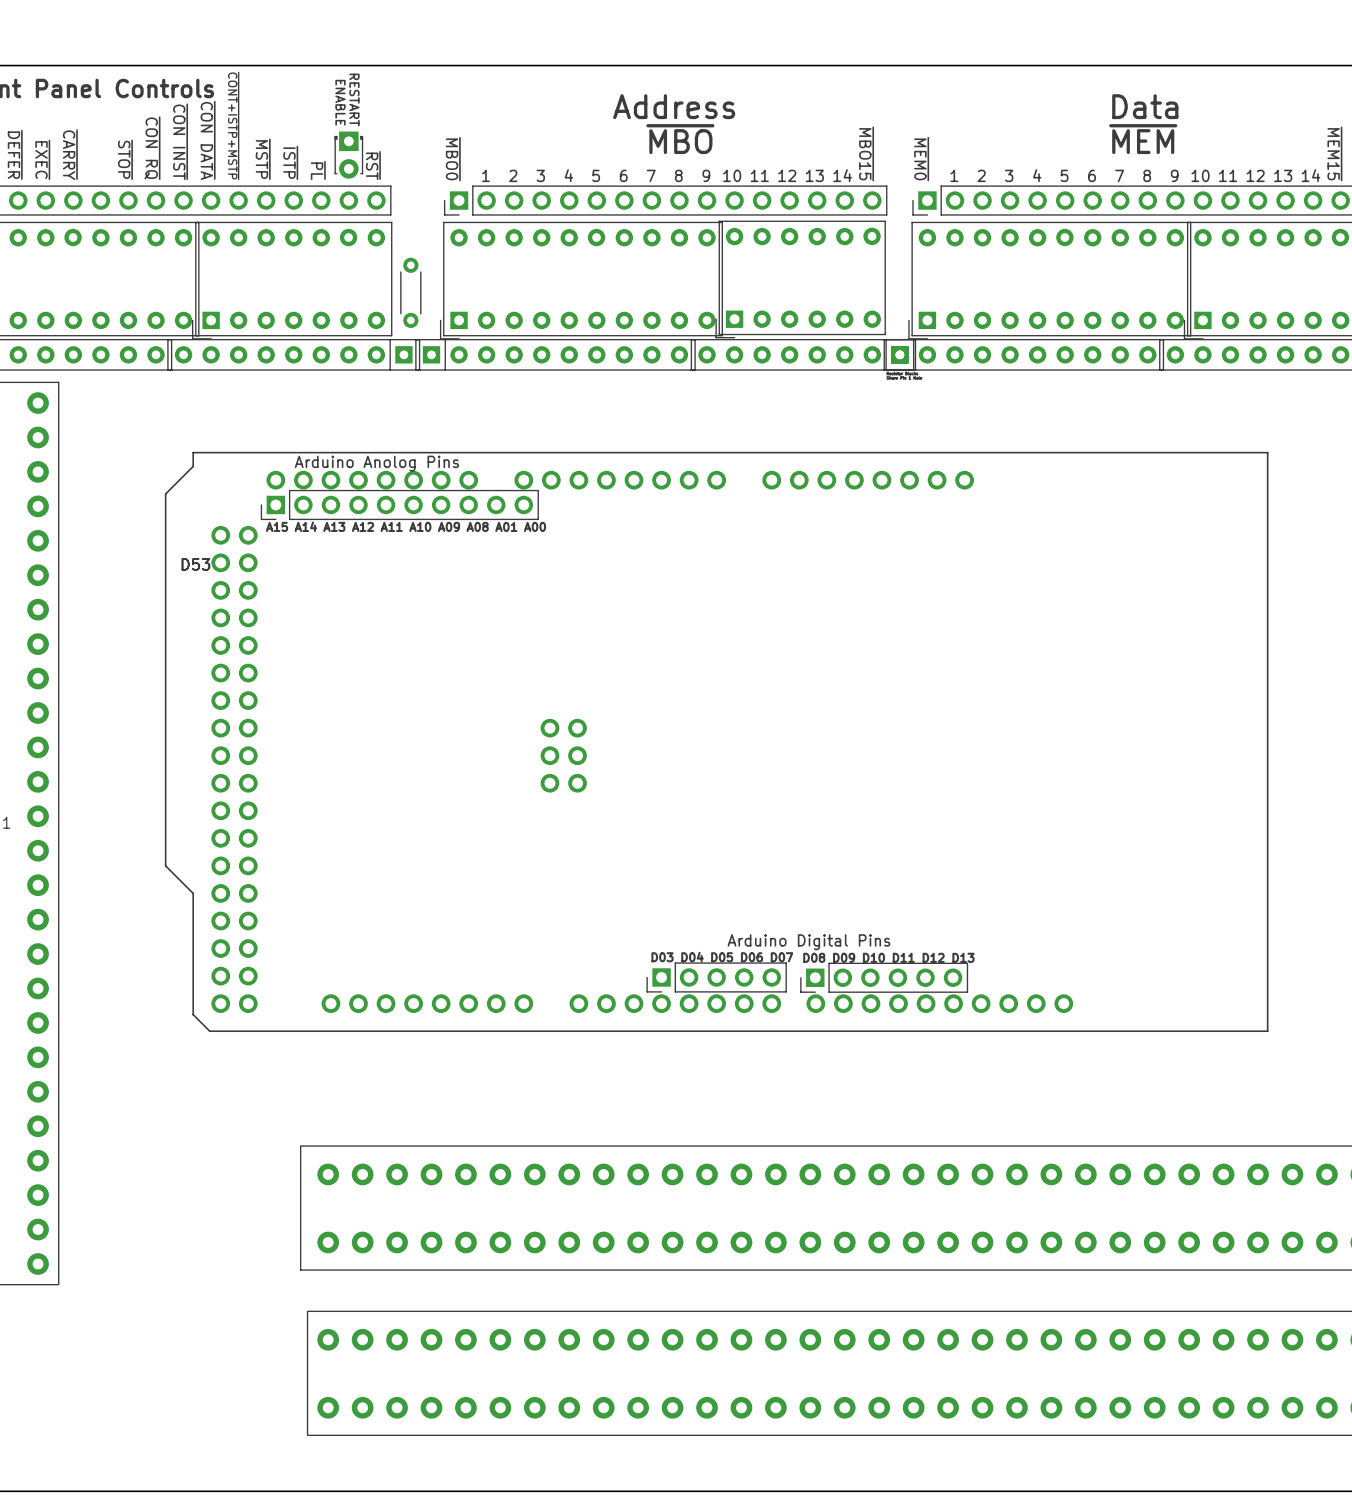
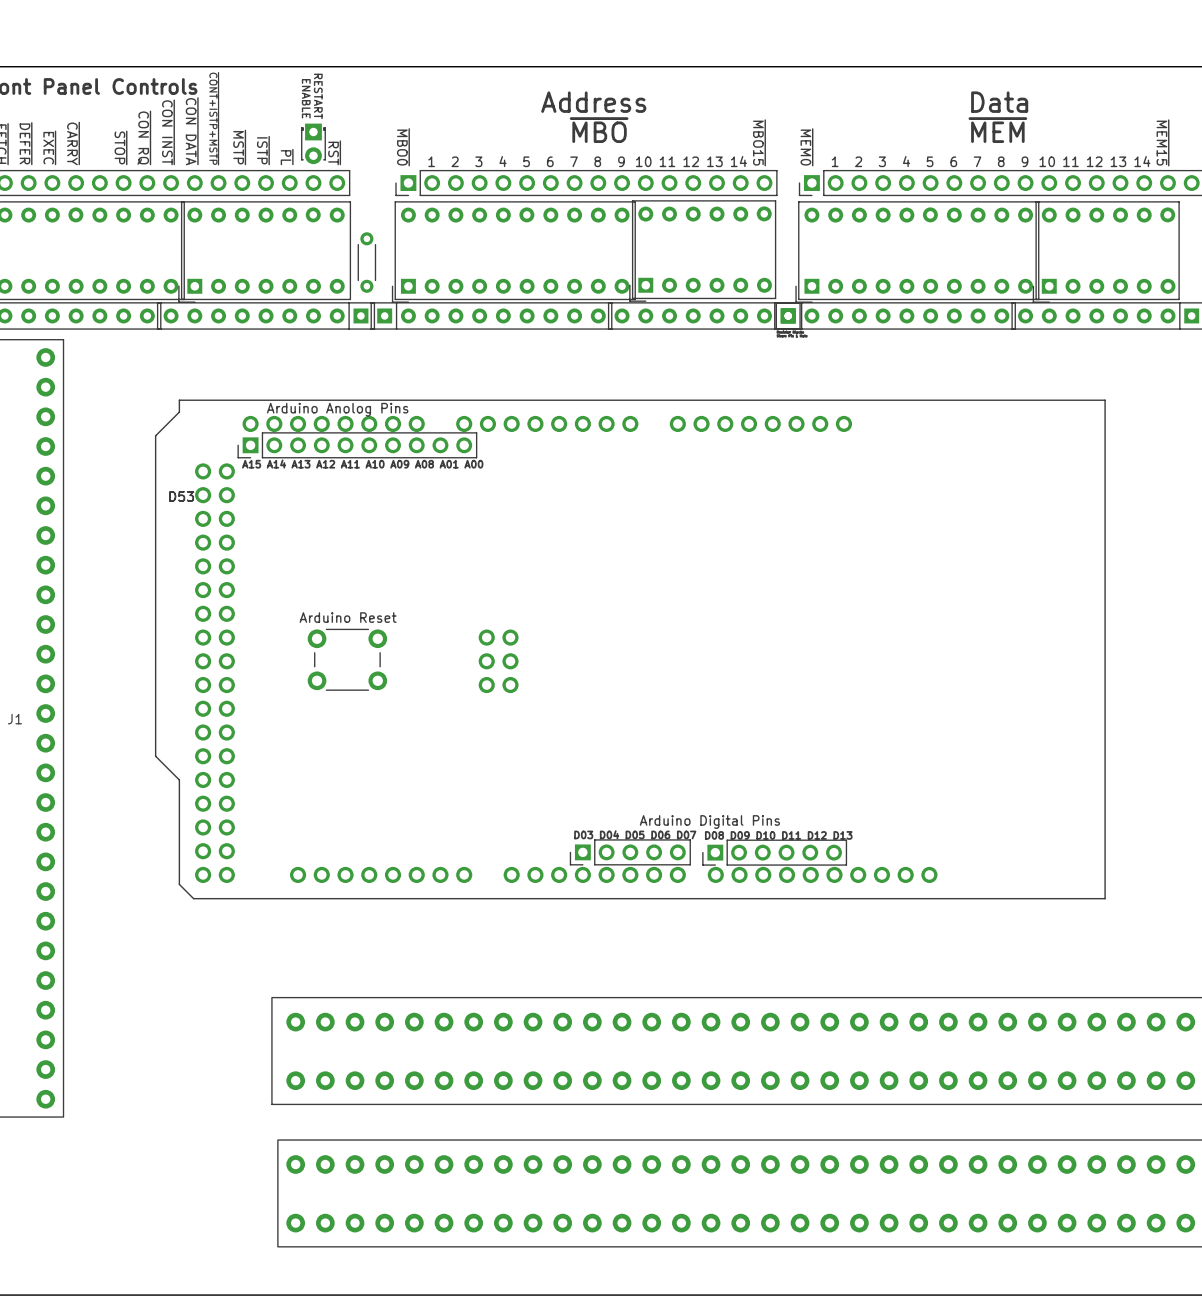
part: none -> Arduino Reset (347, 659)

